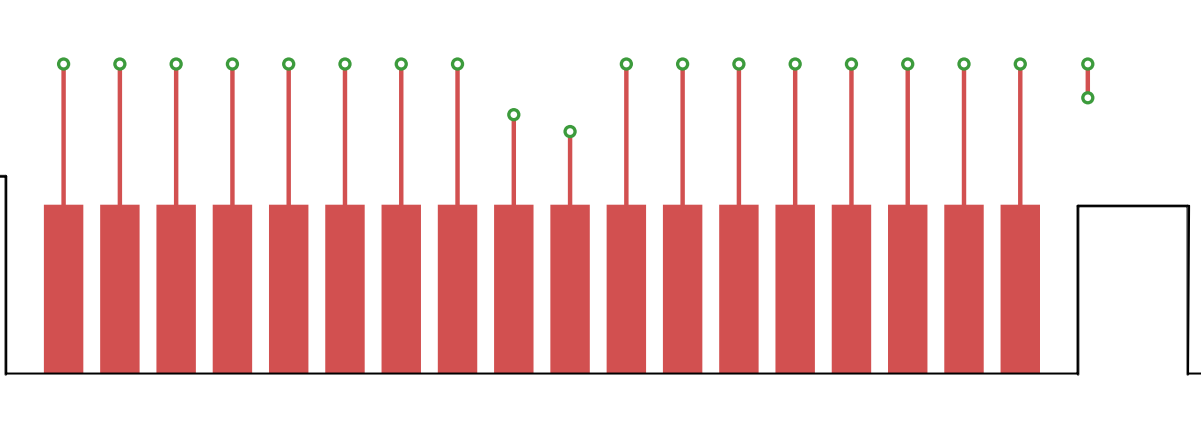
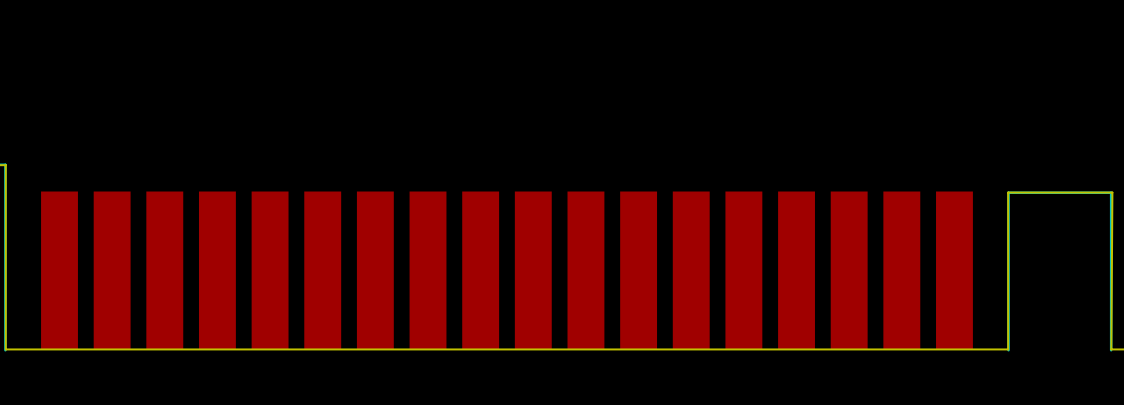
track: (63, 64) (63, 289) -> none
via: (63, 64) -> none
track: (119, 64) (119, 289) -> none
via: (119, 64) -> none
track: (176, 64) (176, 289) -> none
via: (176, 64) -> none
track: (232, 64) (232, 289) -> none
via: (232, 64) -> none
track: (288, 64) (288, 289) -> none
via: (288, 64) -> none
track: (344, 64) (344, 289) -> none
via: (344, 64) -> none
track: (401, 64) (401, 289) -> none
via: (401, 64) -> none
track: (457, 64) (457, 289) -> none
via: (457, 64) -> none
track: (626, 64) (626, 289) -> none
via: (626, 64) -> none
track: (682, 64) (682, 289) -> none
via: (682, 64) -> none
track: (738, 64) (738, 289) -> none
via: (738, 64) -> none
track: (795, 64) (795, 289) -> none
via: (795, 64) -> none
track: (851, 64) (851, 289) -> none
via: (851, 64) -> none
track: (907, 64) (907, 289) -> none
via: (907, 64) -> none
track: (964, 64) (964, 289) -> none
via: (964, 64) -> none
track: (1020, 64) (1020, 289) -> none
via: (1020, 64) -> none
track: (1087, 64) (1087, 97) -> none
via: (1087, 64) -> none
via: (1087, 97) -> none
track: (513, 114) (513, 289) -> none
via: (513, 114) -> none
track: (570, 131) (570, 289) -> none
via: (570, 131) -> none

